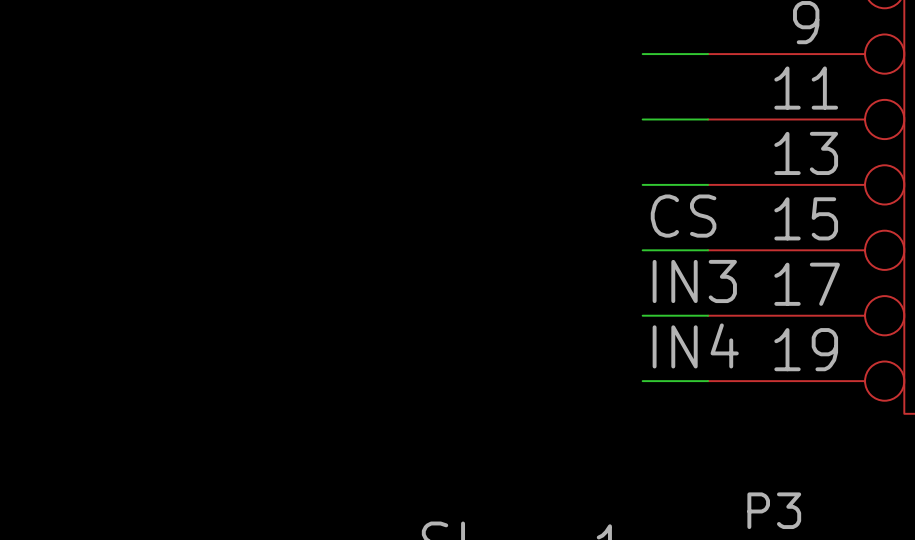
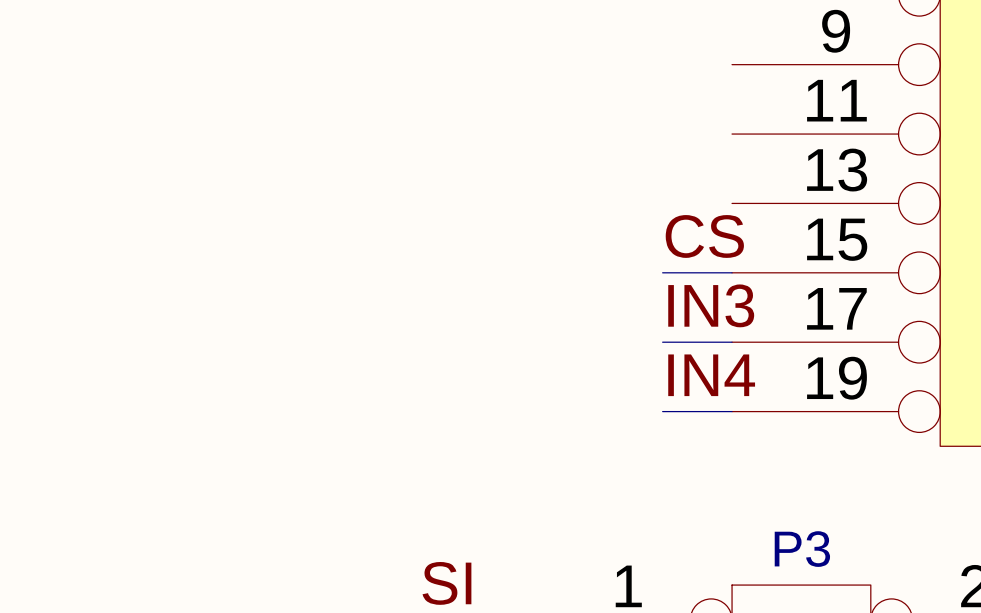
wire: (642, 54) (708, 54) -> none
wire: (642, 119) (708, 119) -> none
wire: (642, 184) (708, 184) -> none

